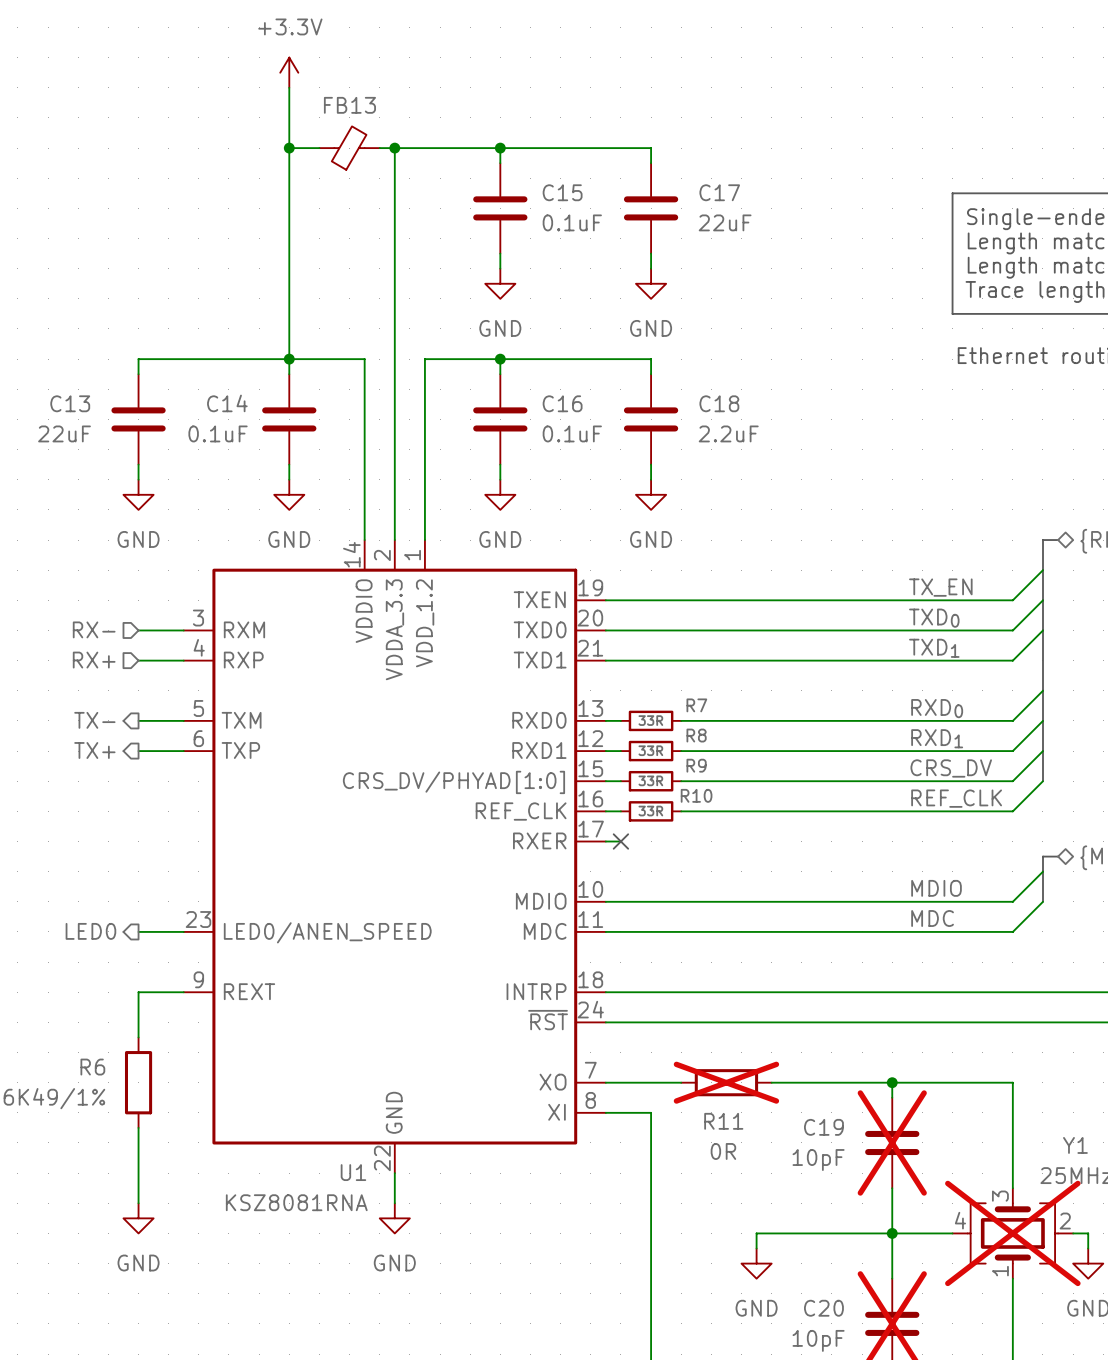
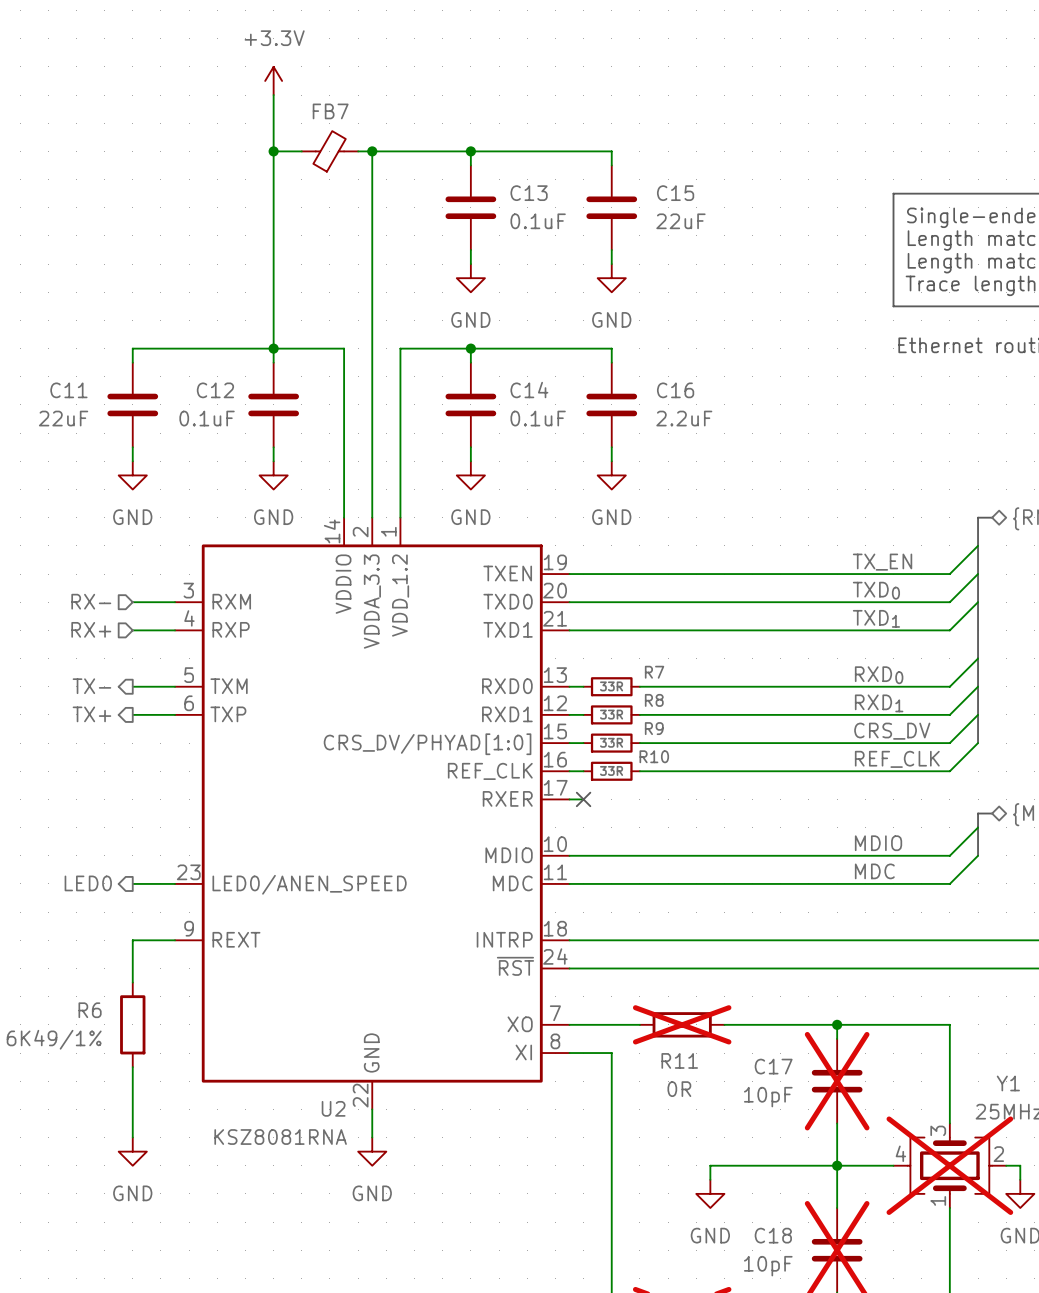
FB13 name: FB13 (349, 105) -> FB7 (330, 111)
C15 name: C15 (562, 192) -> C13 (529, 193)
C17 name: C17 (719, 192) -> C15 (675, 193)
C13 name: C13 (70, 403) -> C11 (68, 390)
C14 name: C14 (227, 403) -> C12 (215, 390)
C16 name: C16 (562, 403) -> C14 (529, 390)
C18 name: C18 (719, 403) -> C16 (675, 390)
C19 name: C19 (823, 1127) -> C17 (773, 1066)
U1 name: U1 (353, 1172) -> U2 (333, 1108)
C20 name: C20 (823, 1308) -> C18 (773, 1235)

